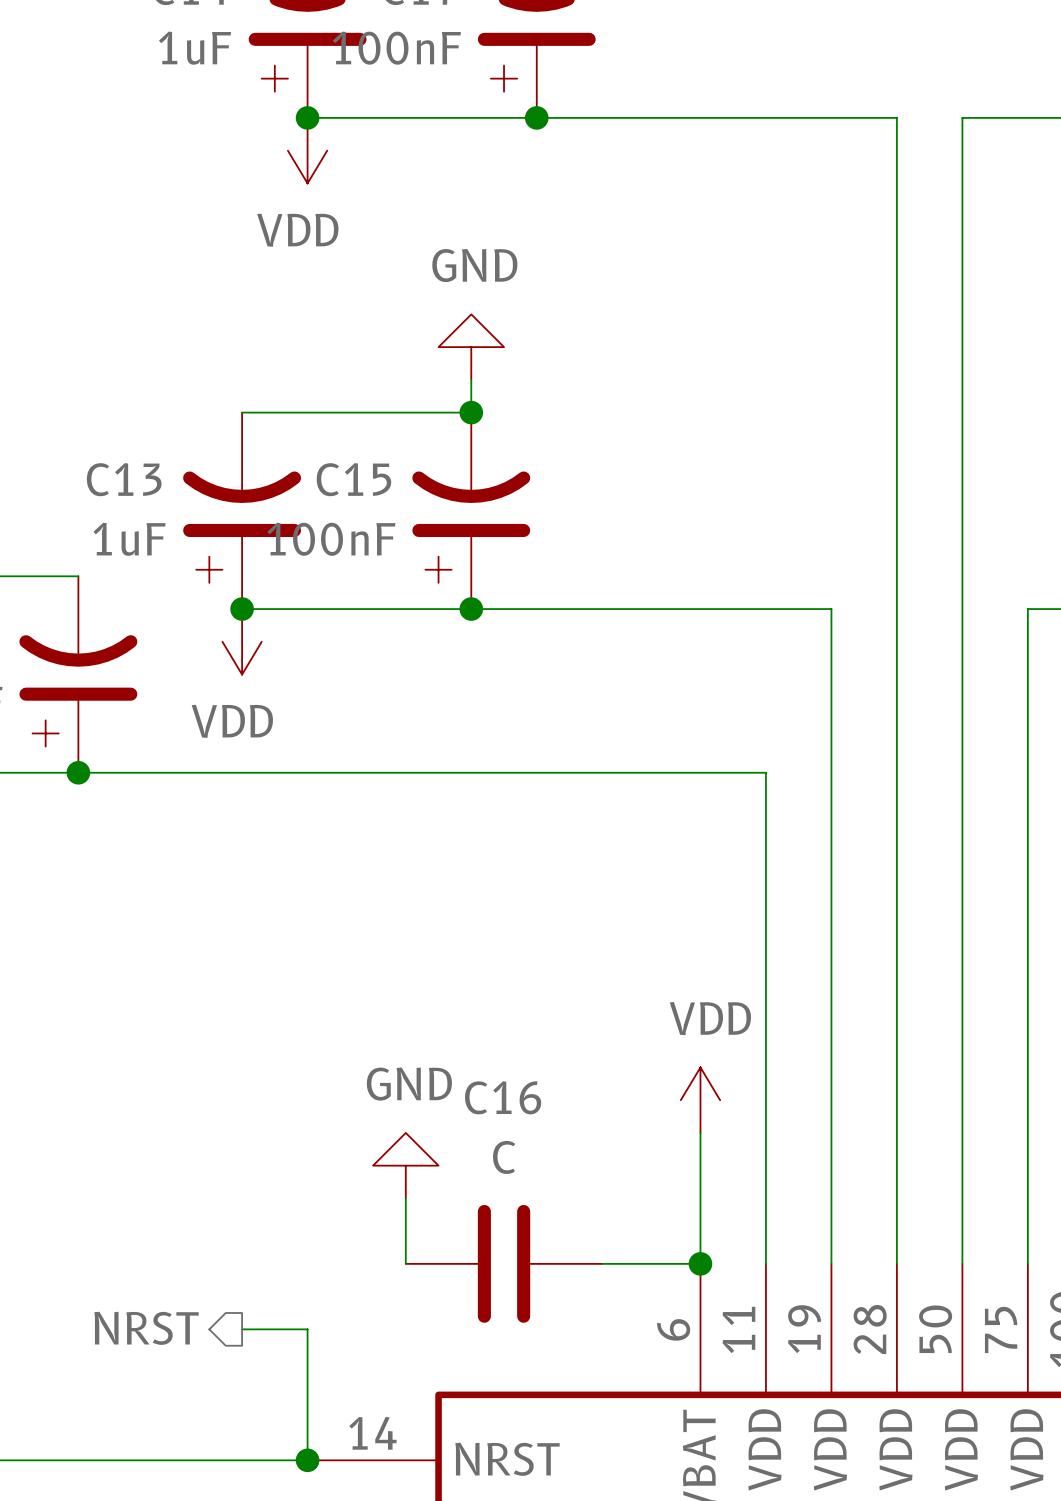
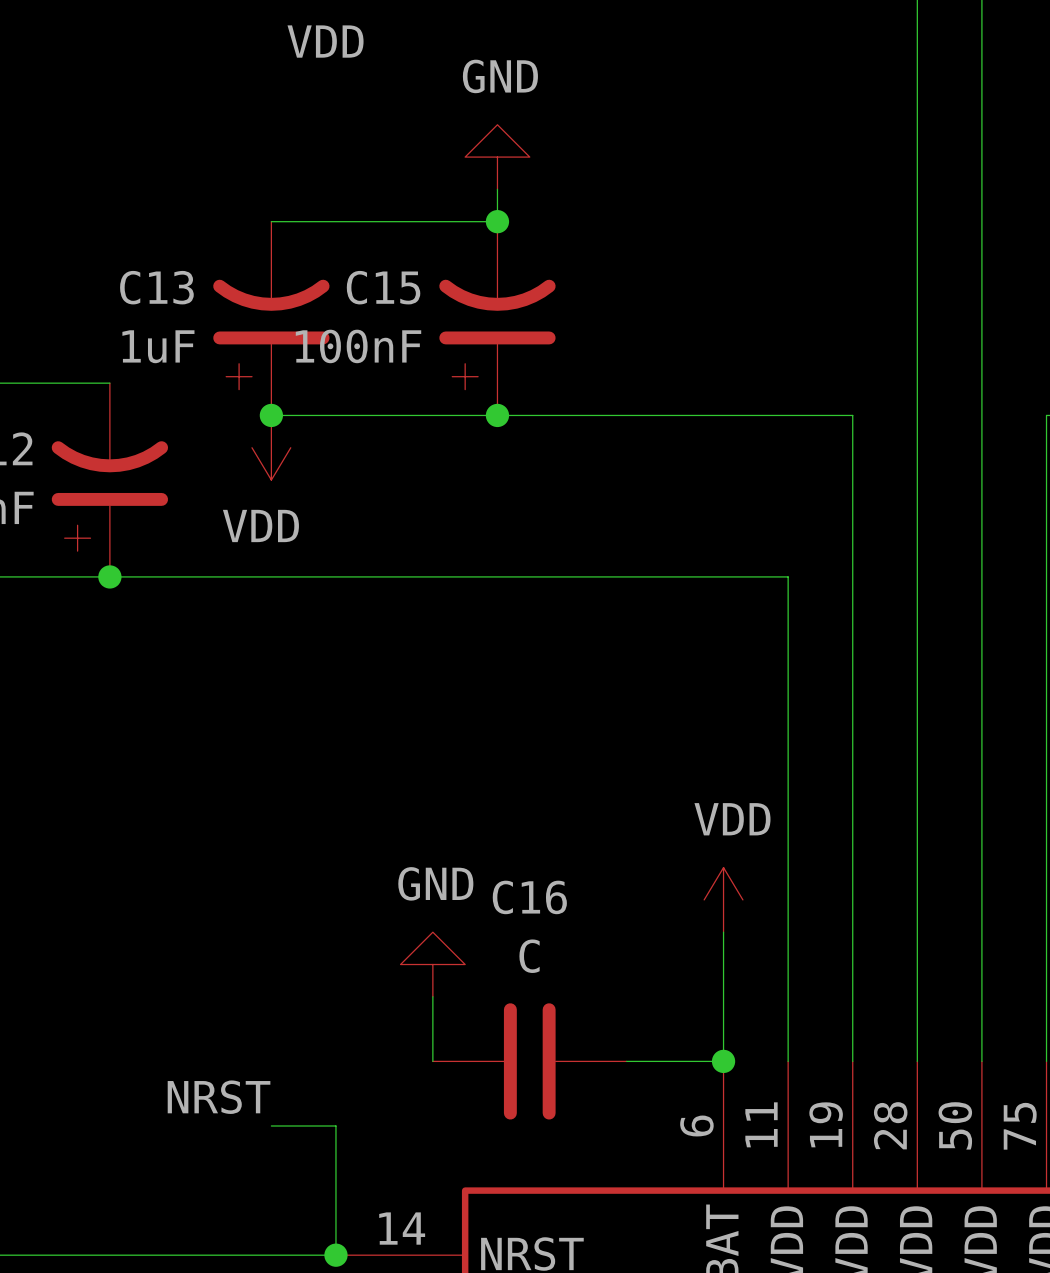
label: none -> NRST (219, 1097)
hierarchical label: NRST (146, 1328) -> none

